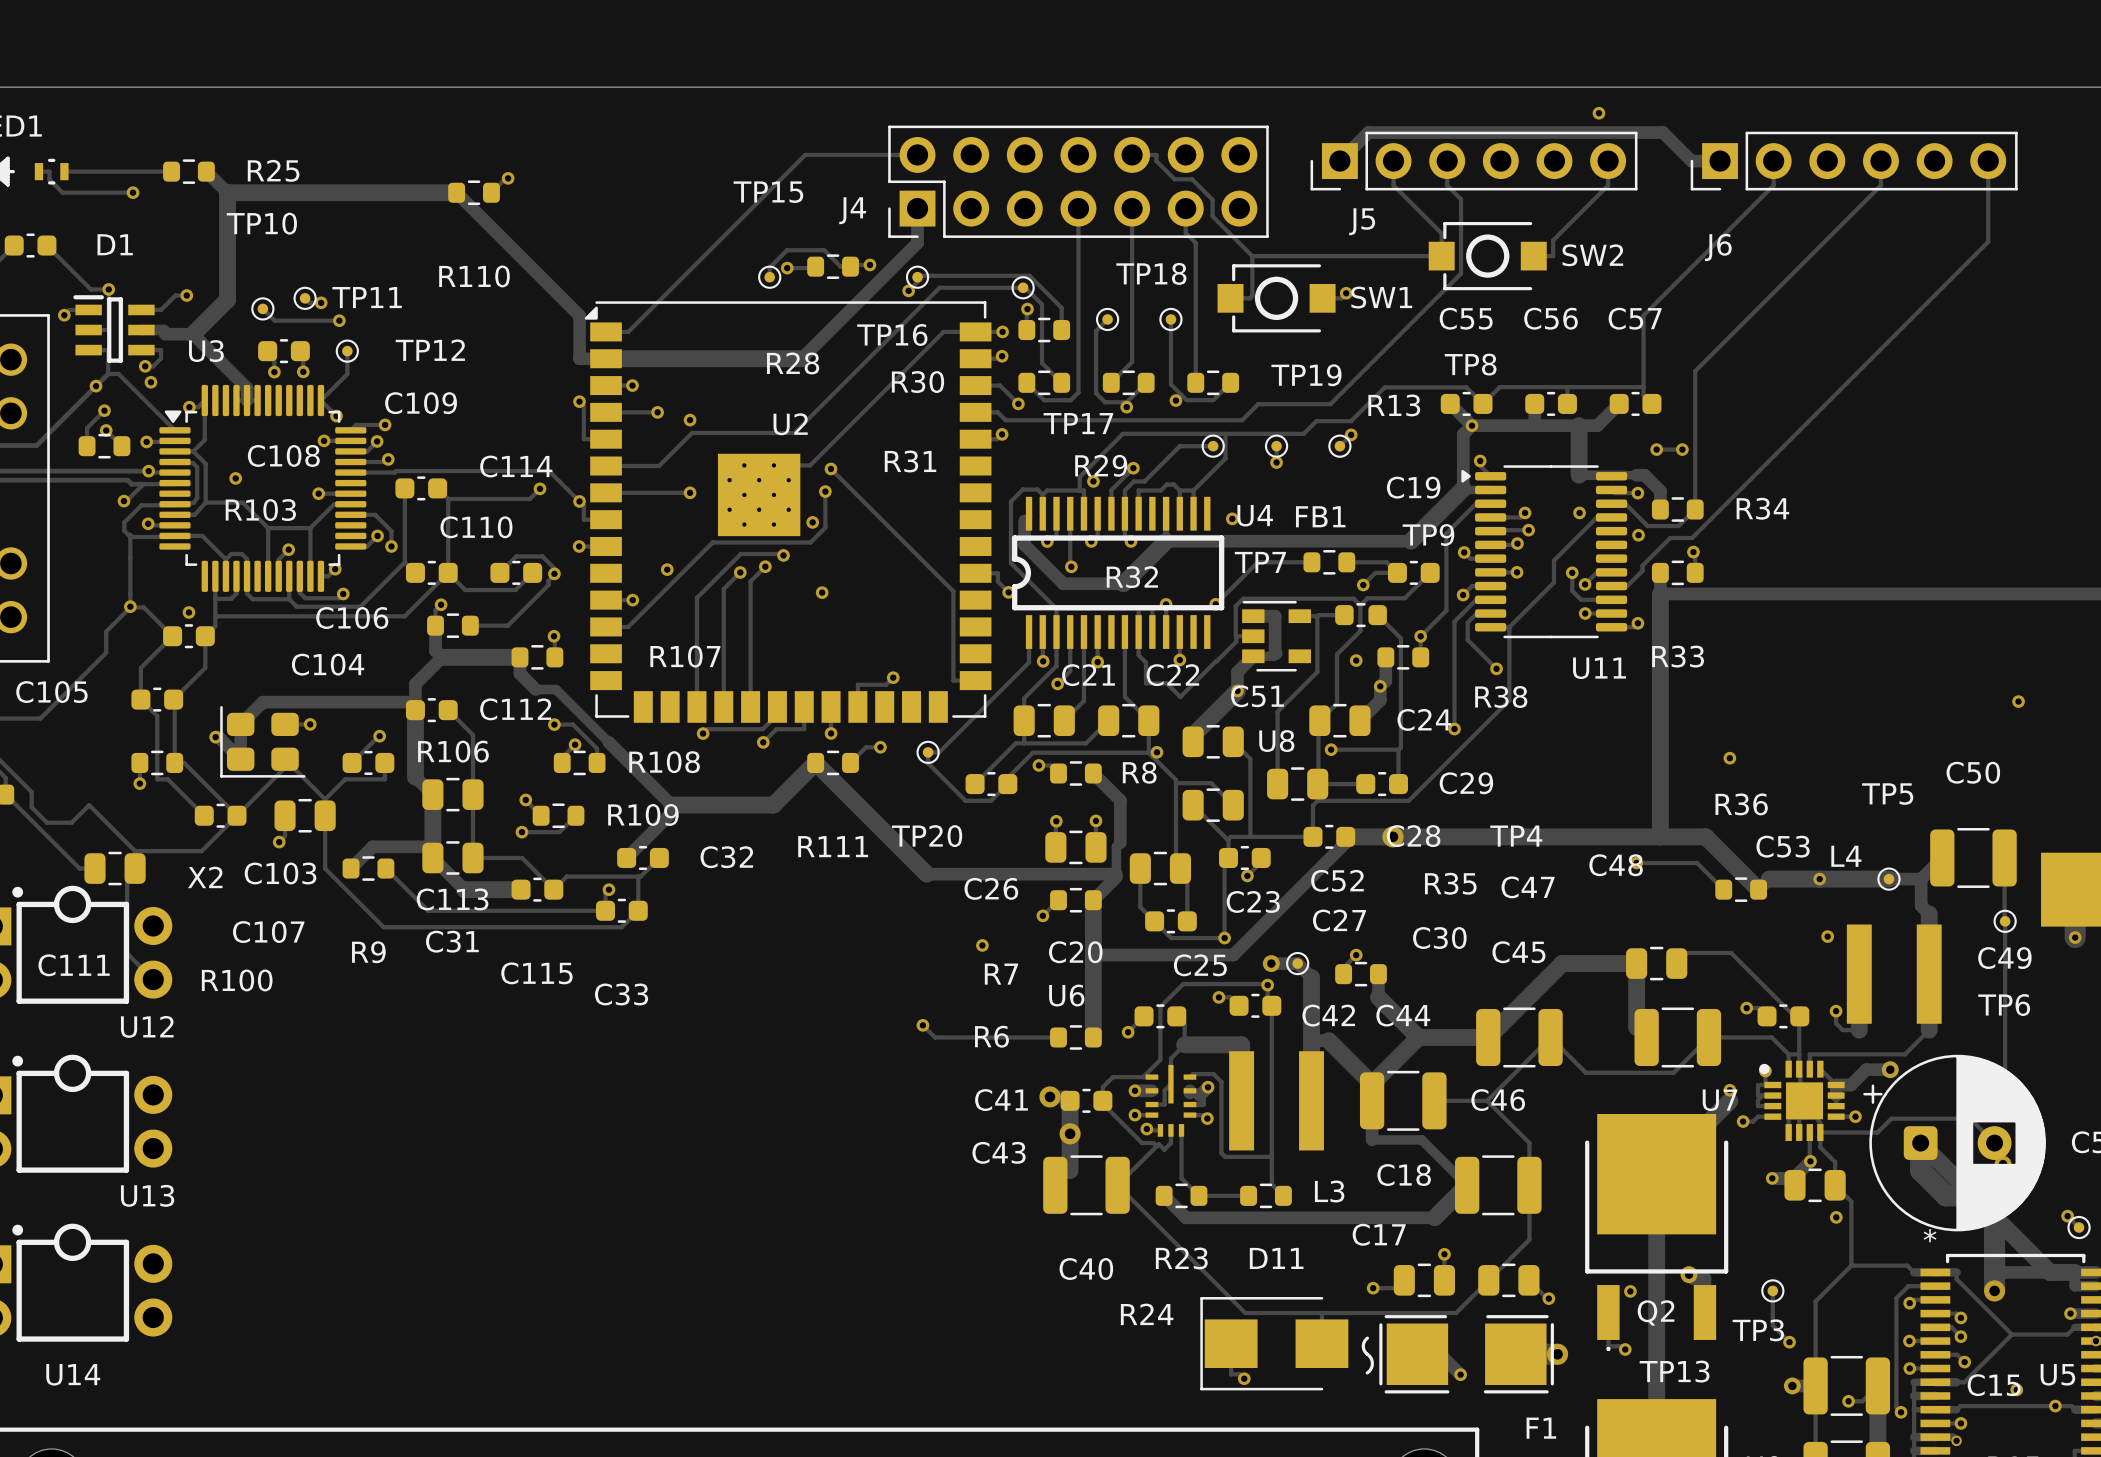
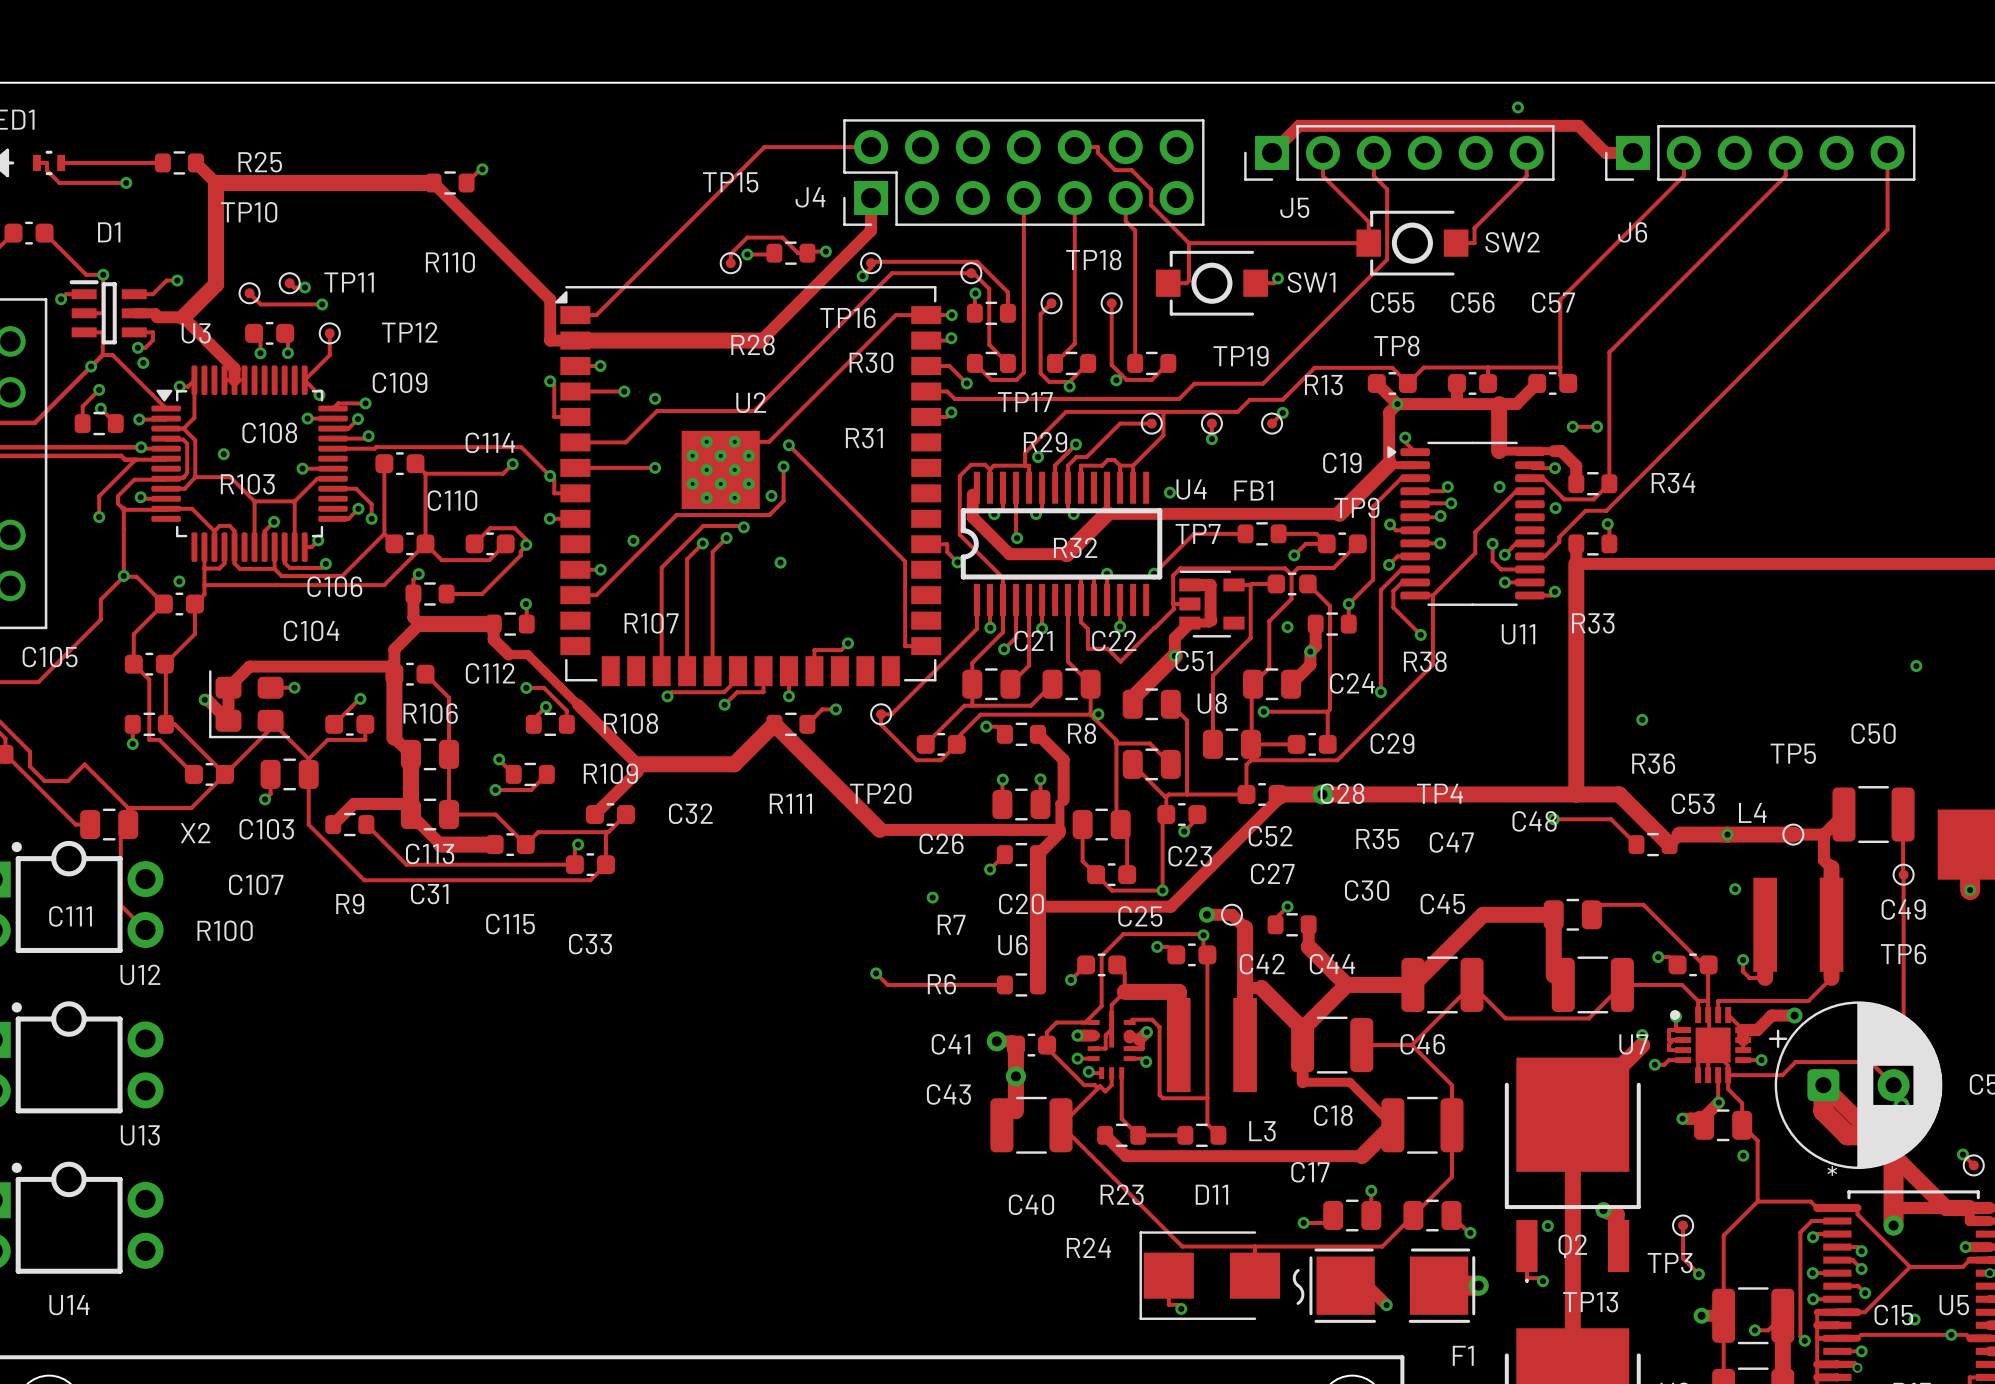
track: (143, 484) (126, 501) (123, 501) -> (136, 459) (99, 496) (99, 517)
via position: (123, 501) -> (99, 517)

